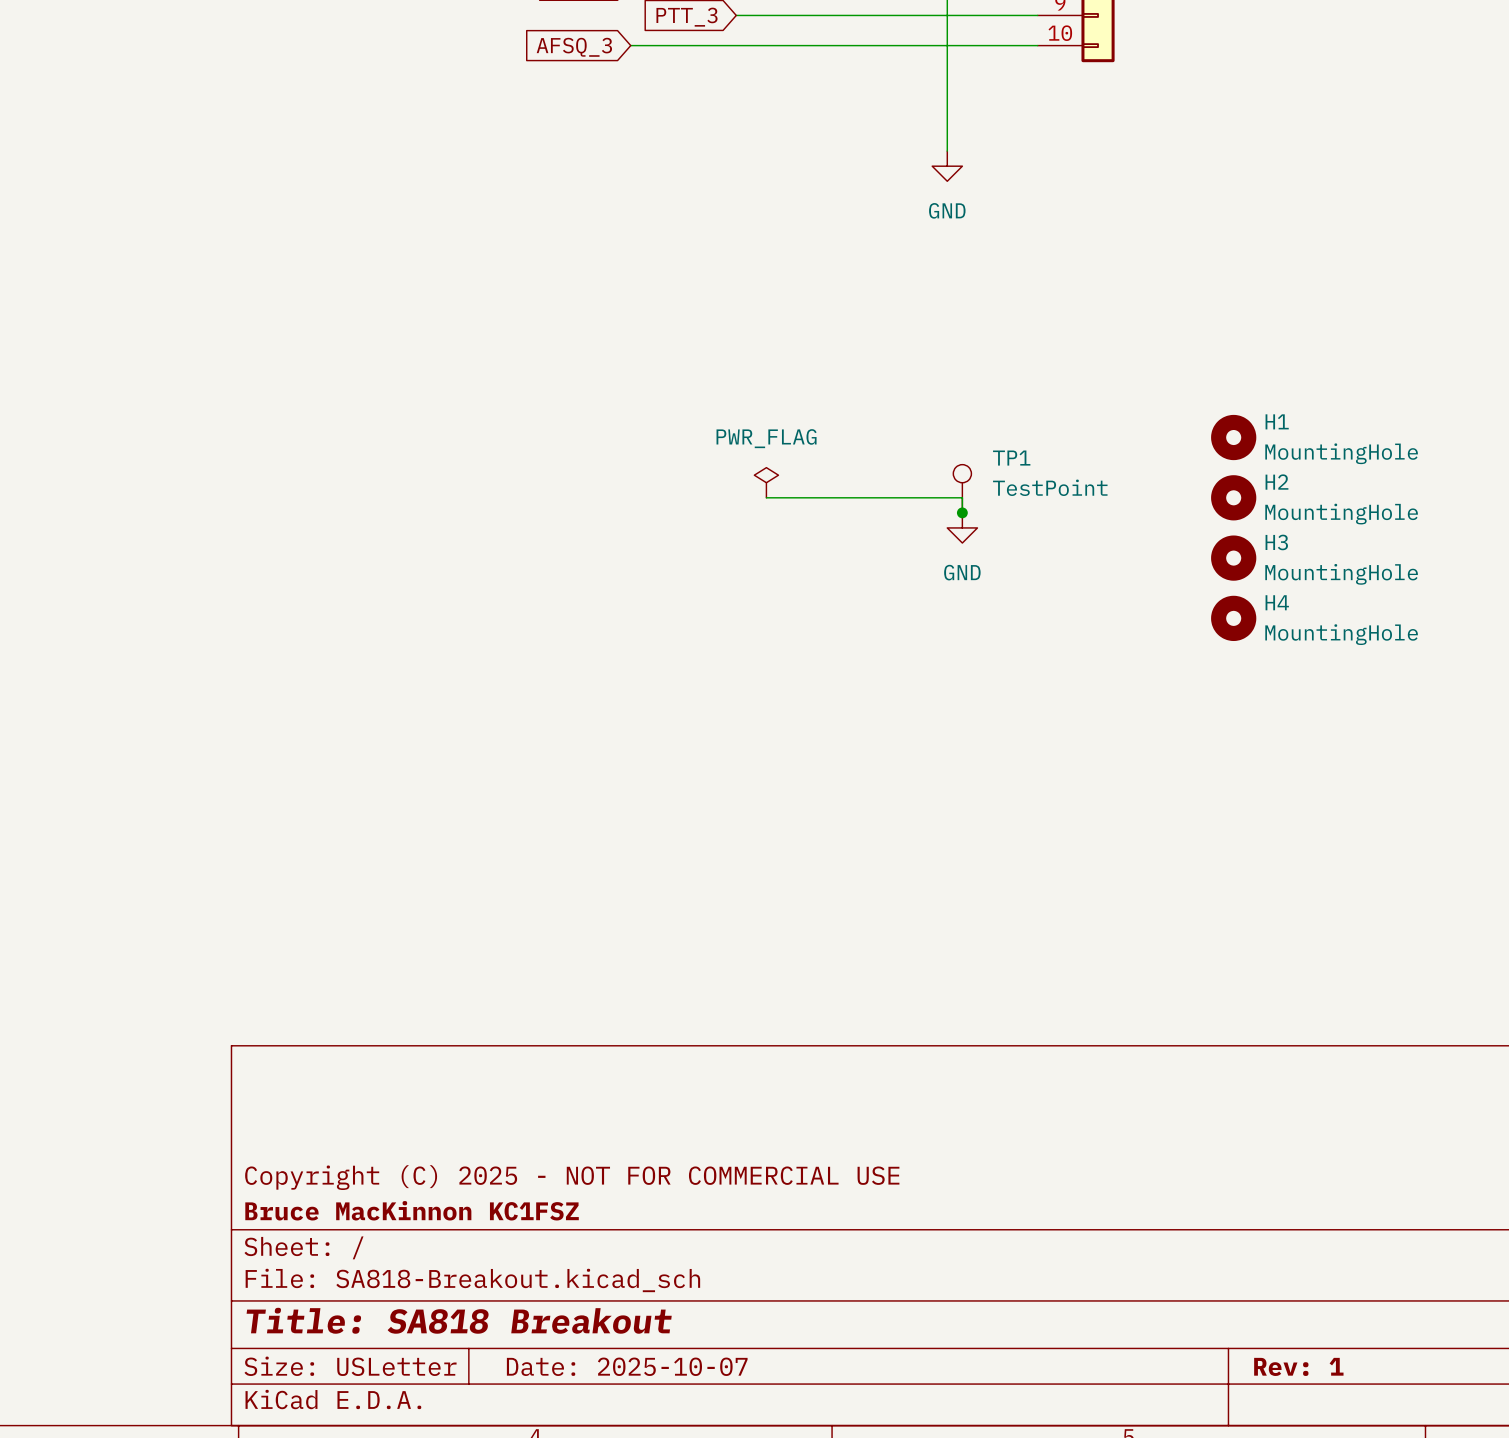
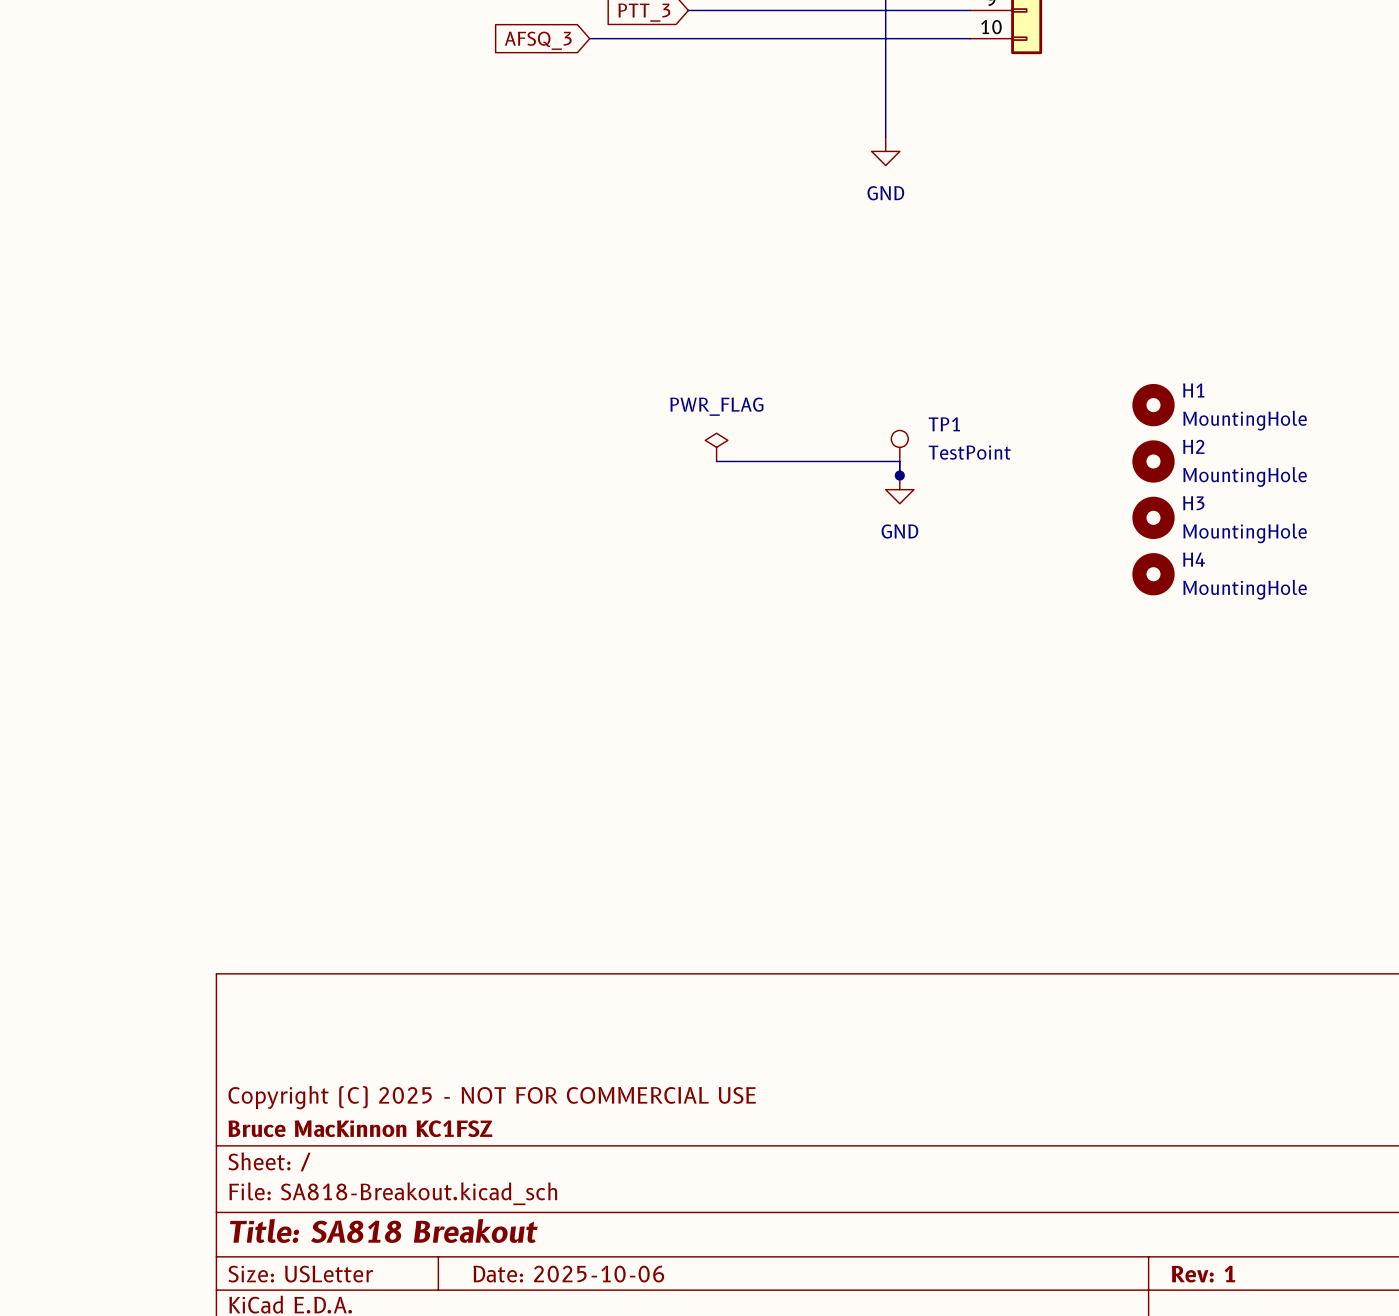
title block: Date: 2025-10-07 (627, 1366) -> Date: 2025-10-06 (568, 1274)

